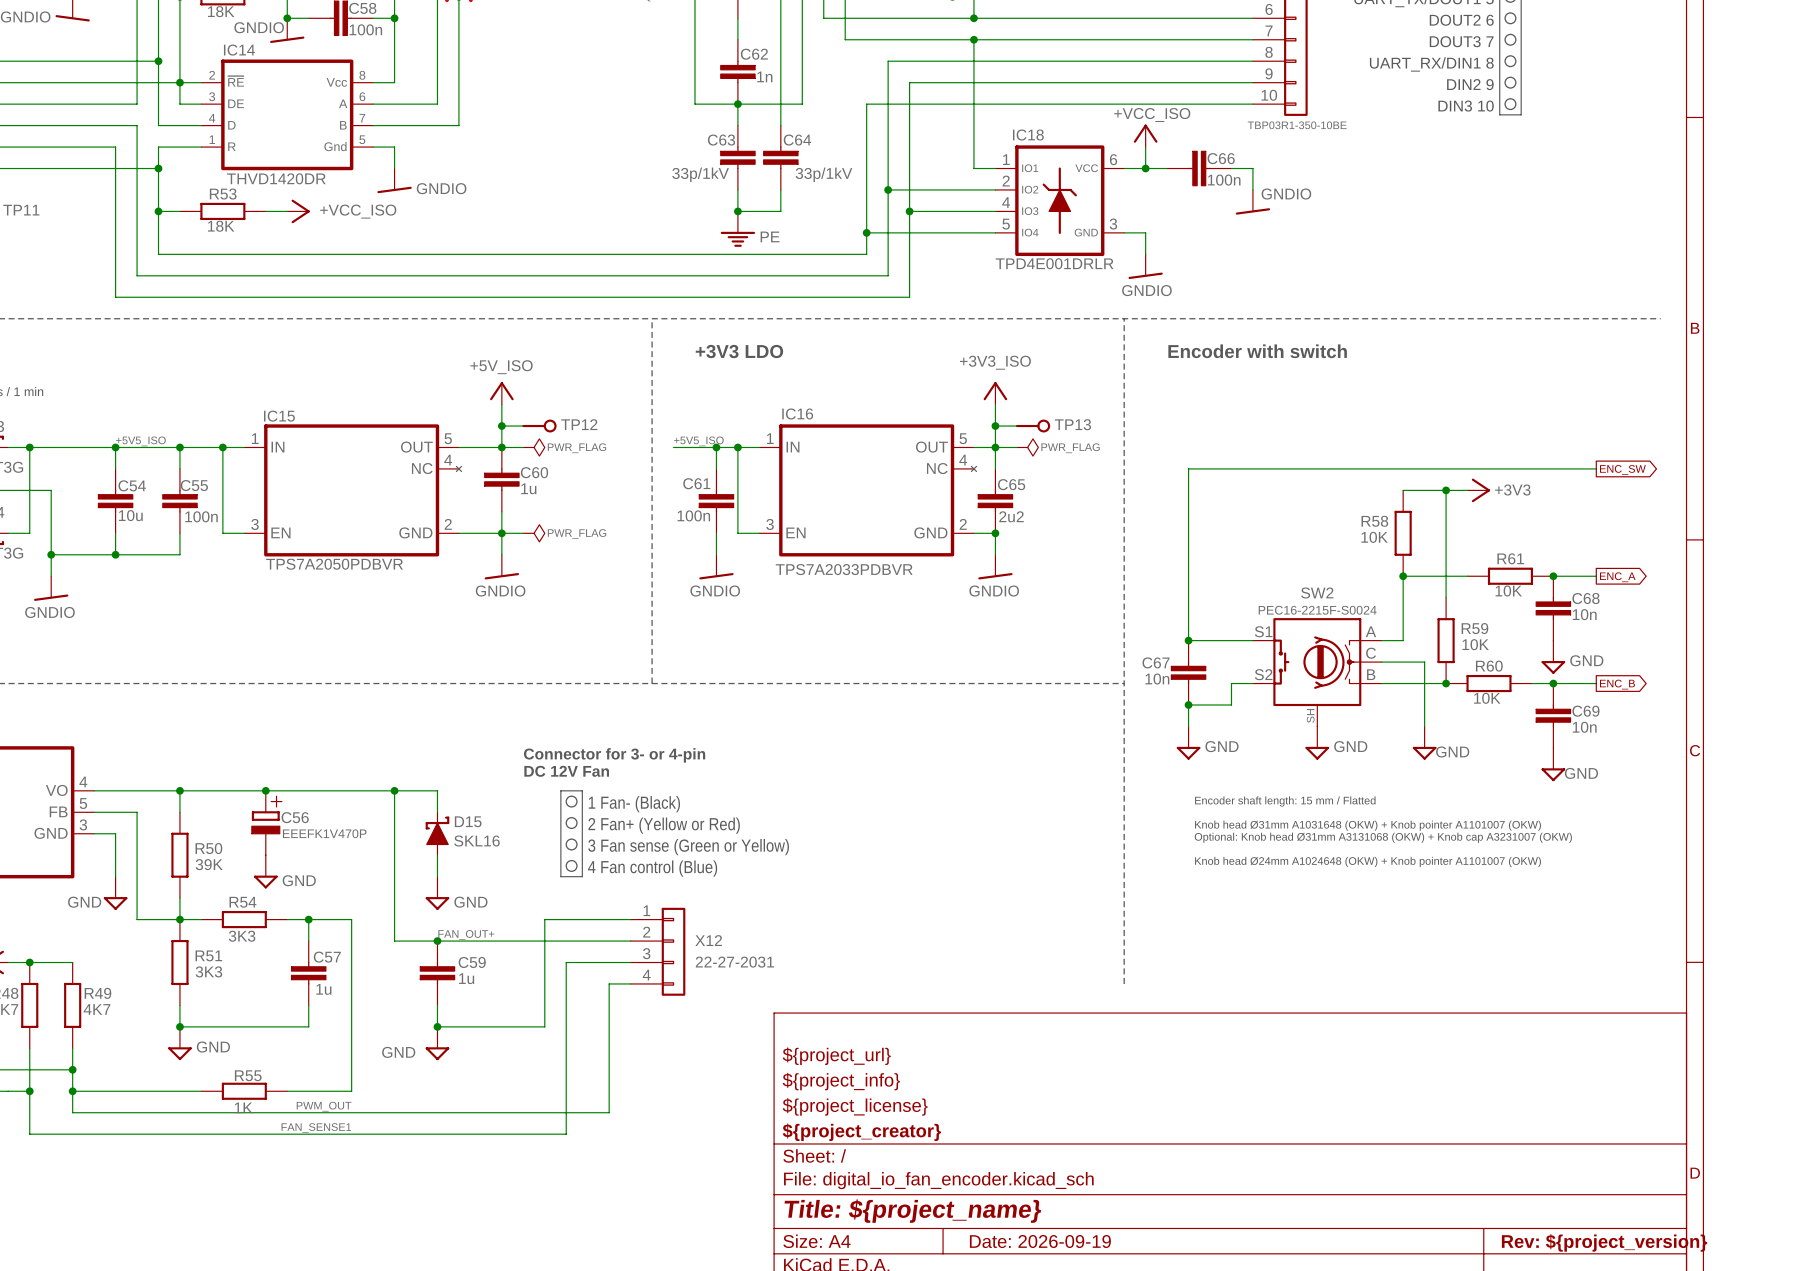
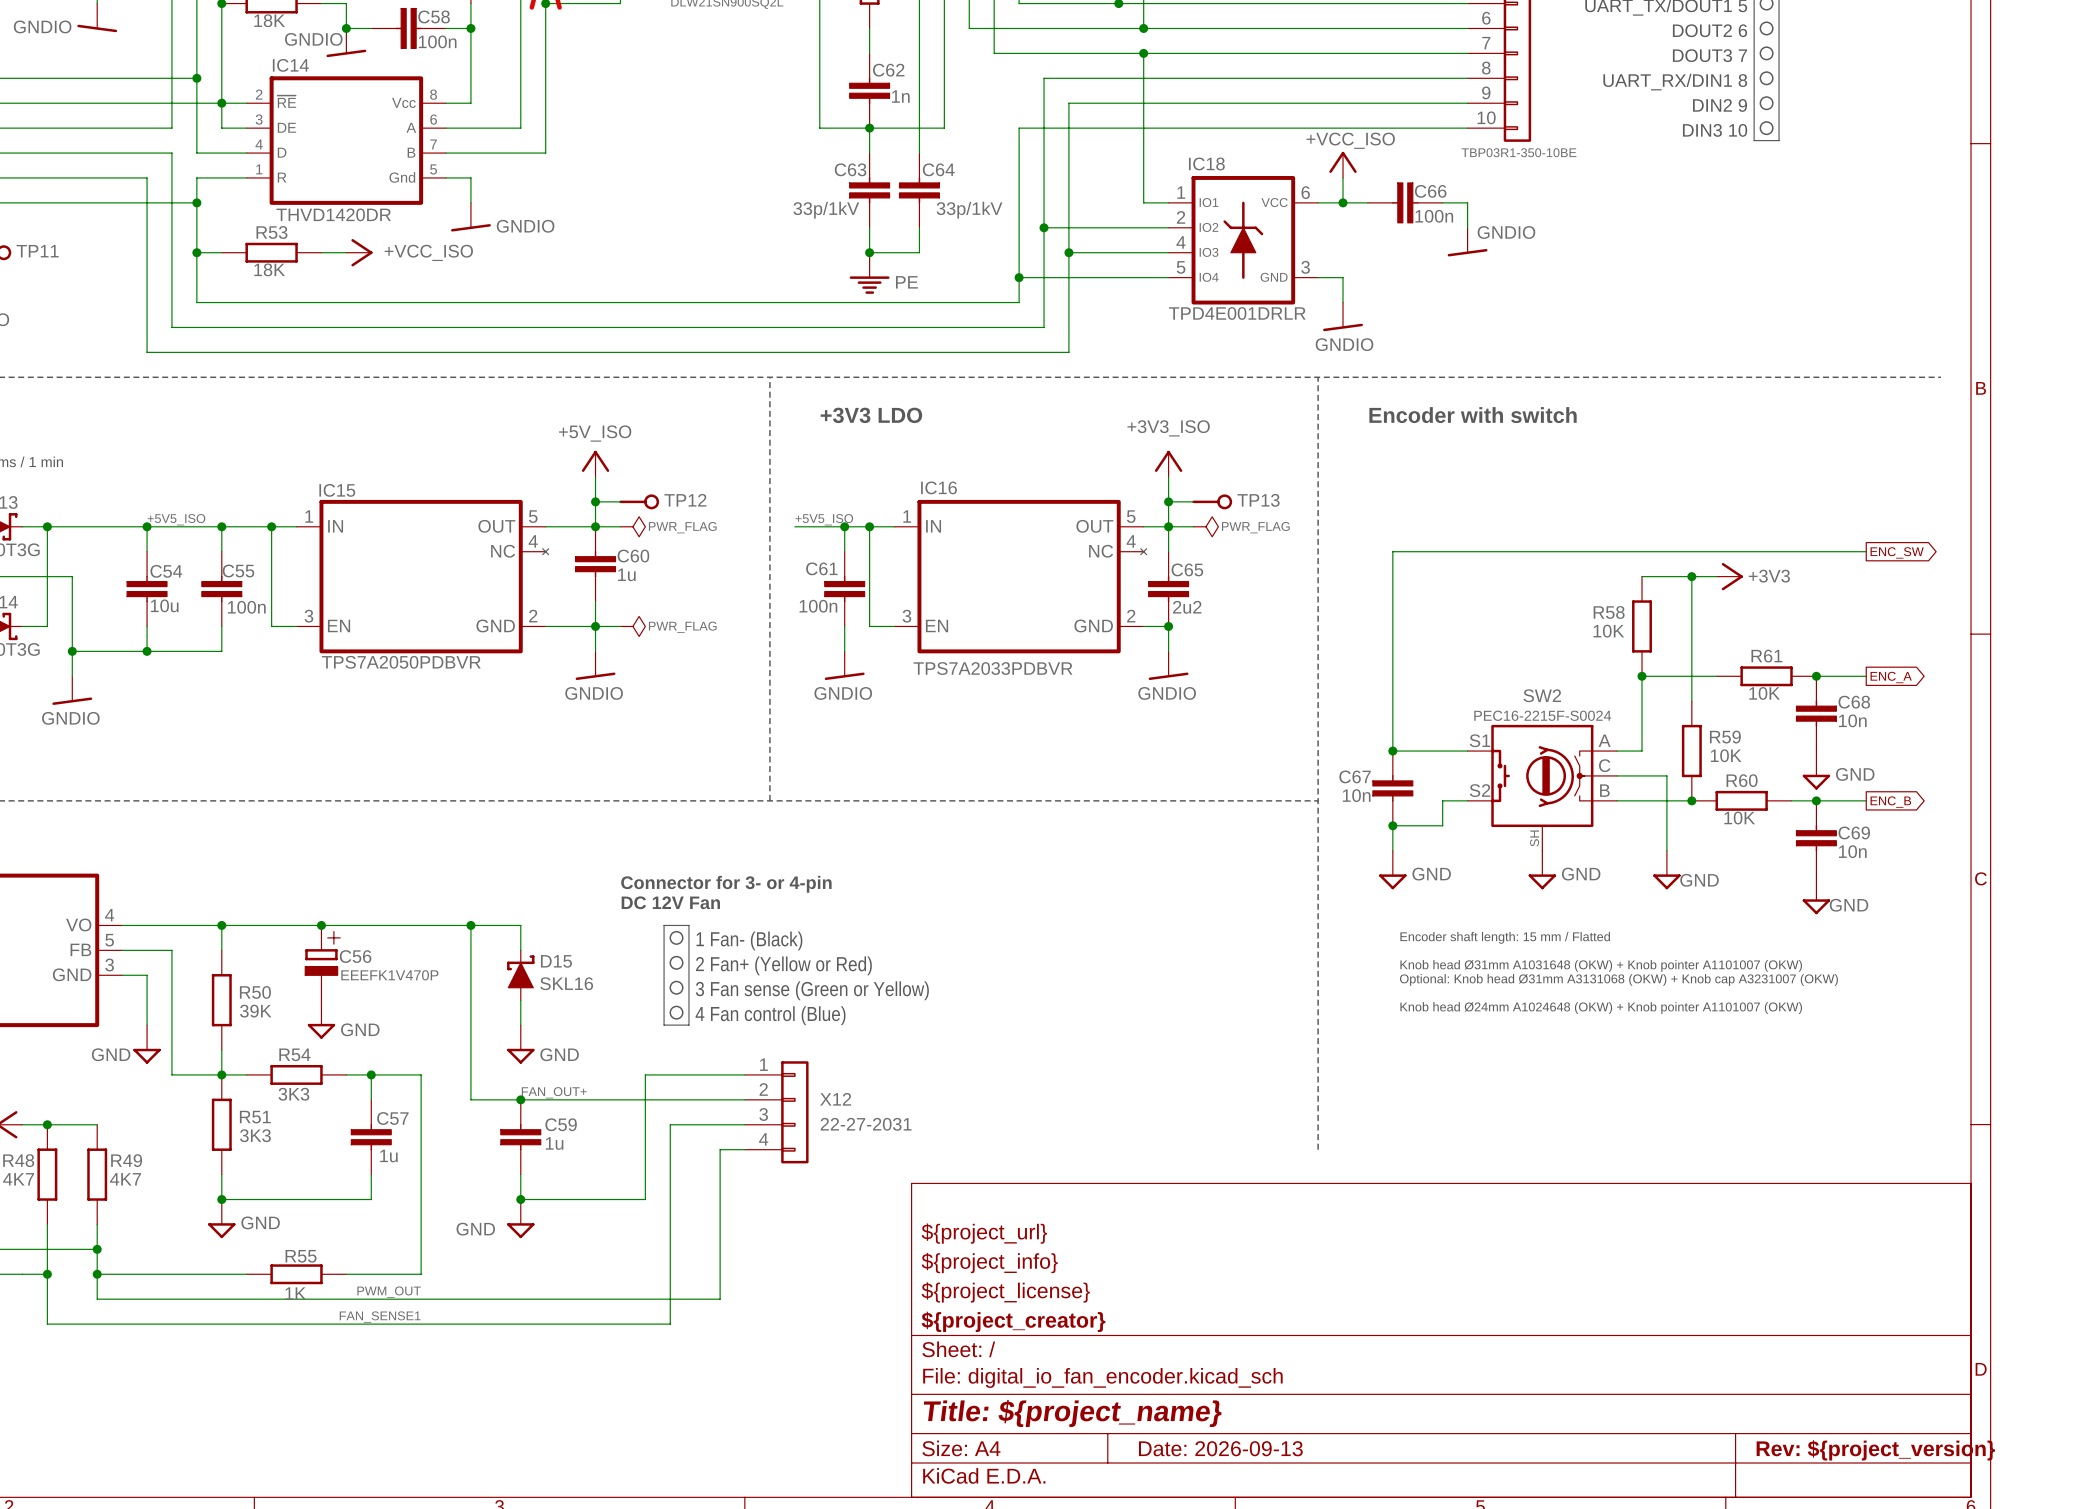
title block: Date: 2026-09-19 (1040, 1241) -> Date: 2026-09-13 (1220, 1448)

